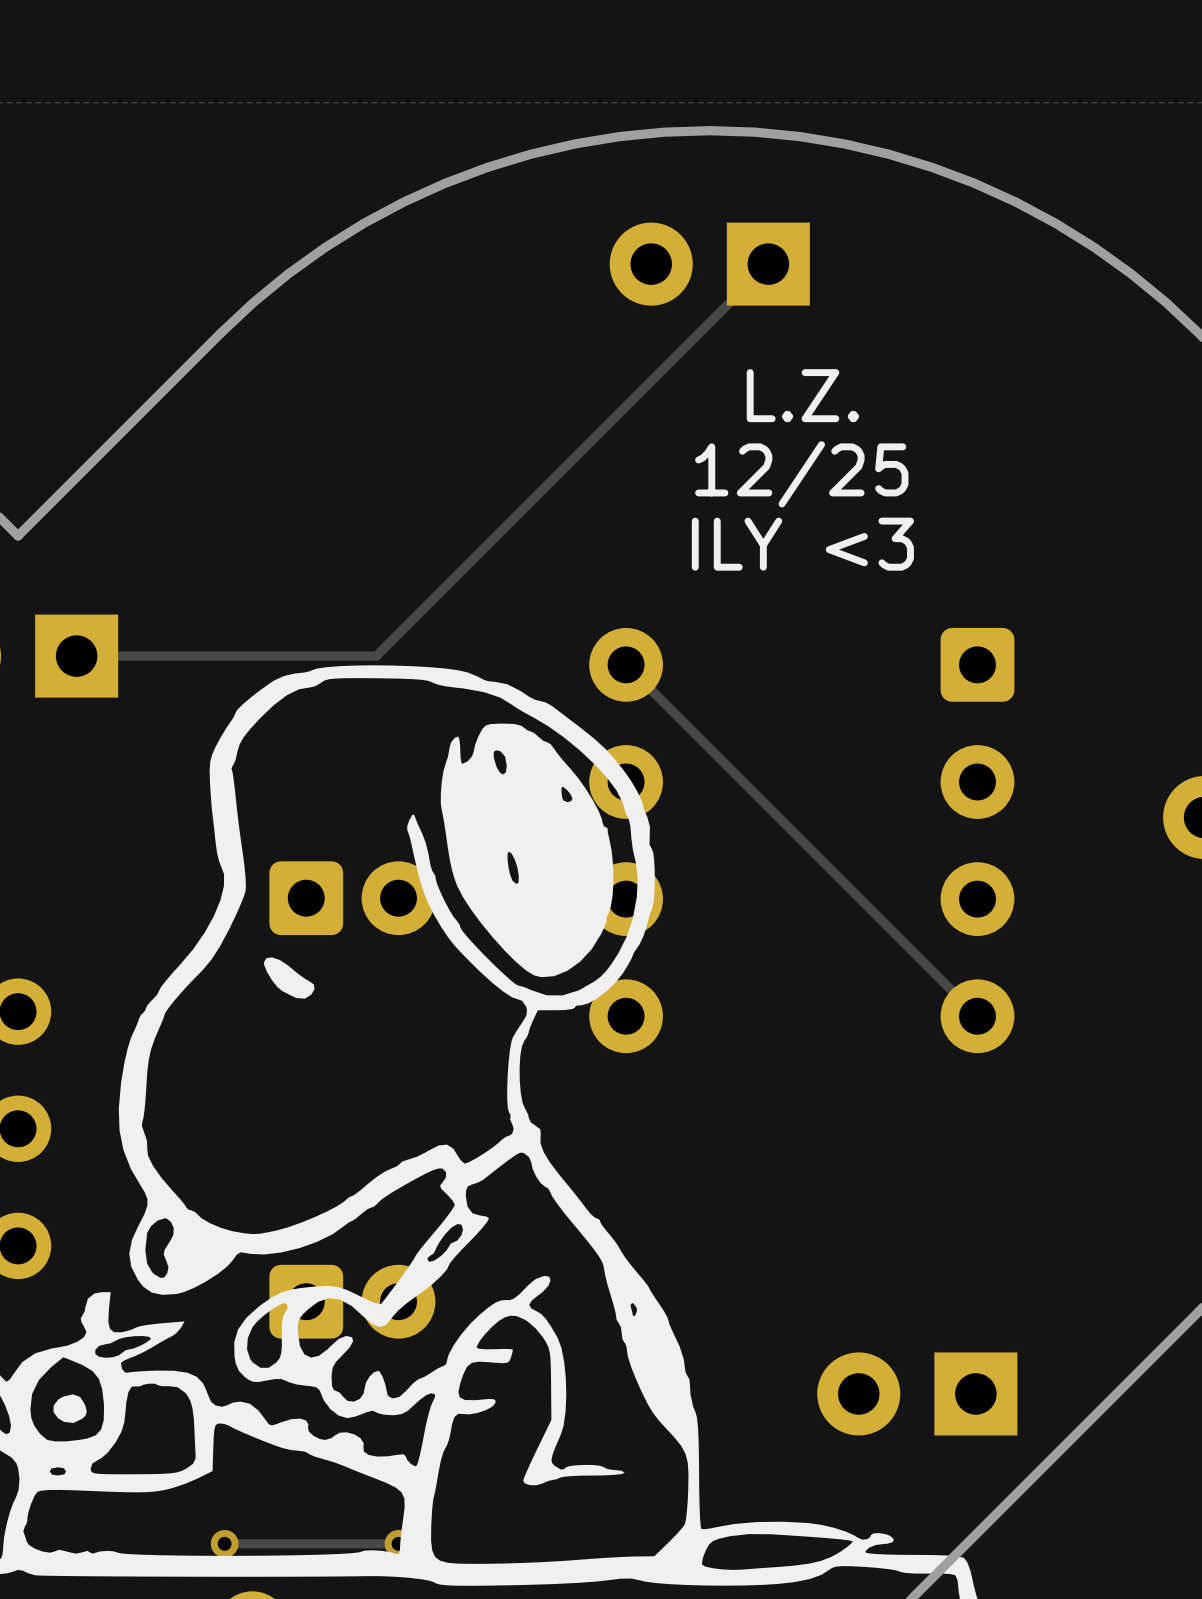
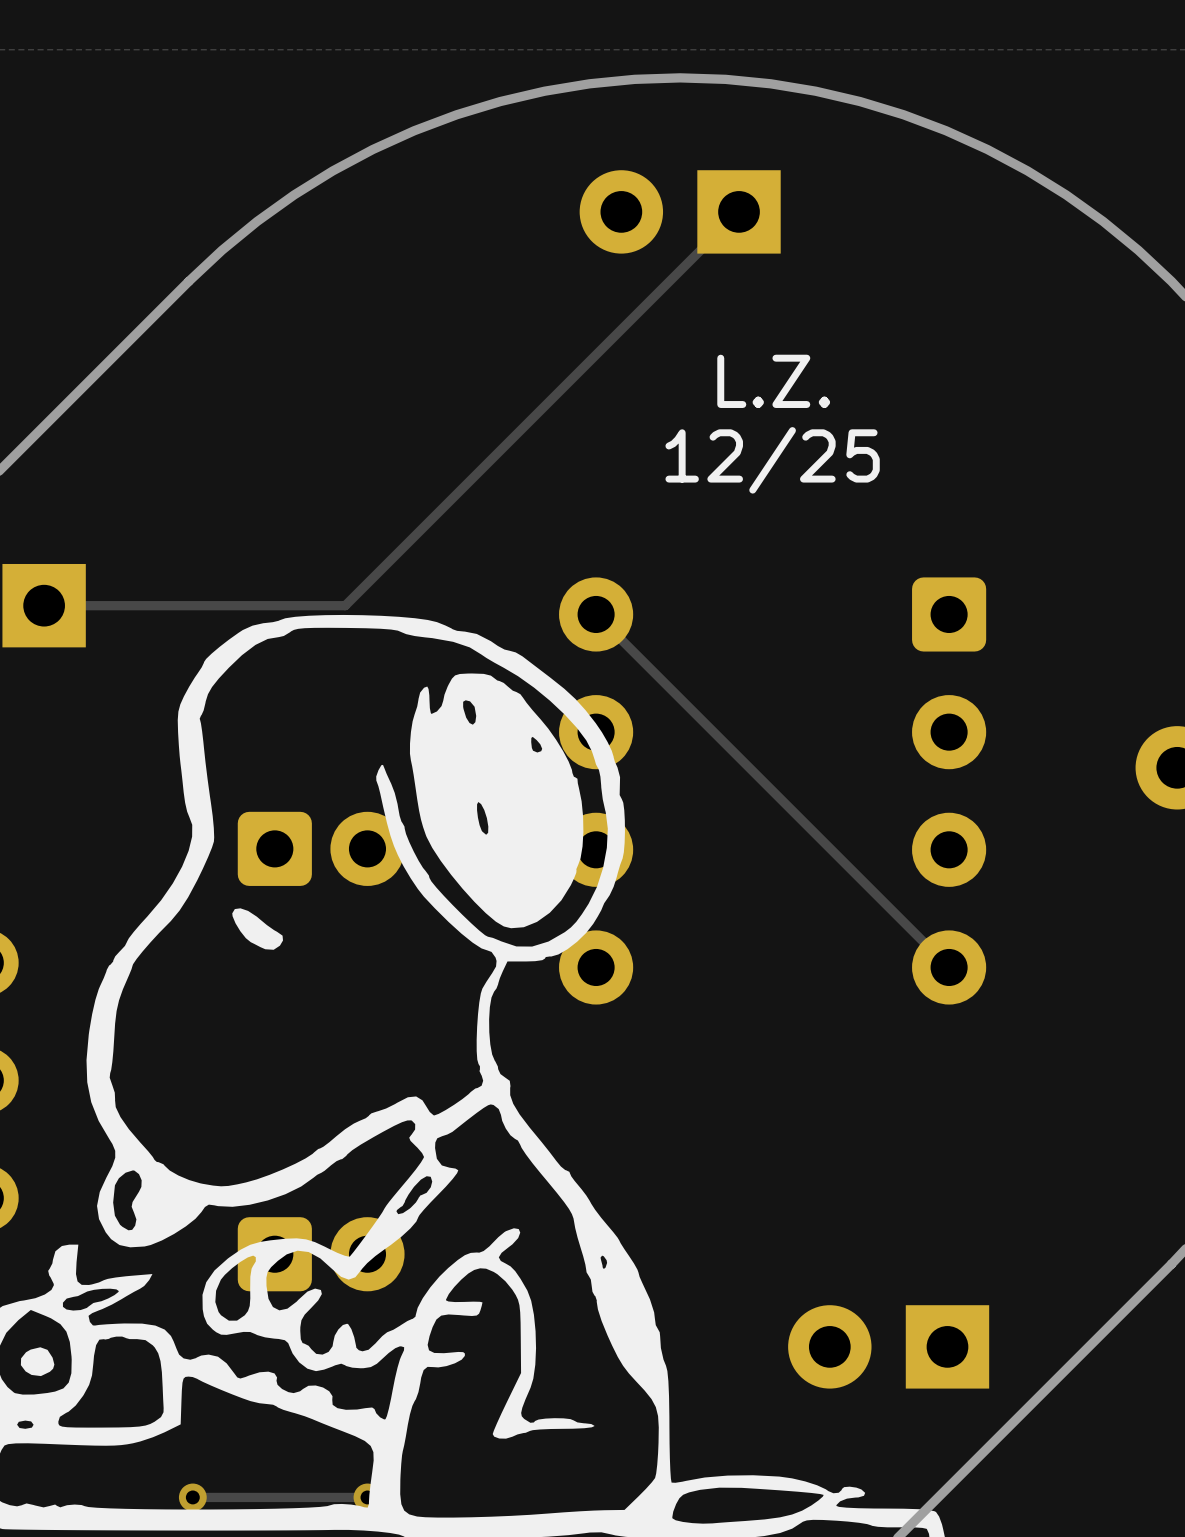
text position: L.Z. (802, 395) -> L.Z. (773, 381)
text position: 12/25 (801, 474) -> 12/25 (772, 460)
text: ILY <3 (802, 544) -> none

